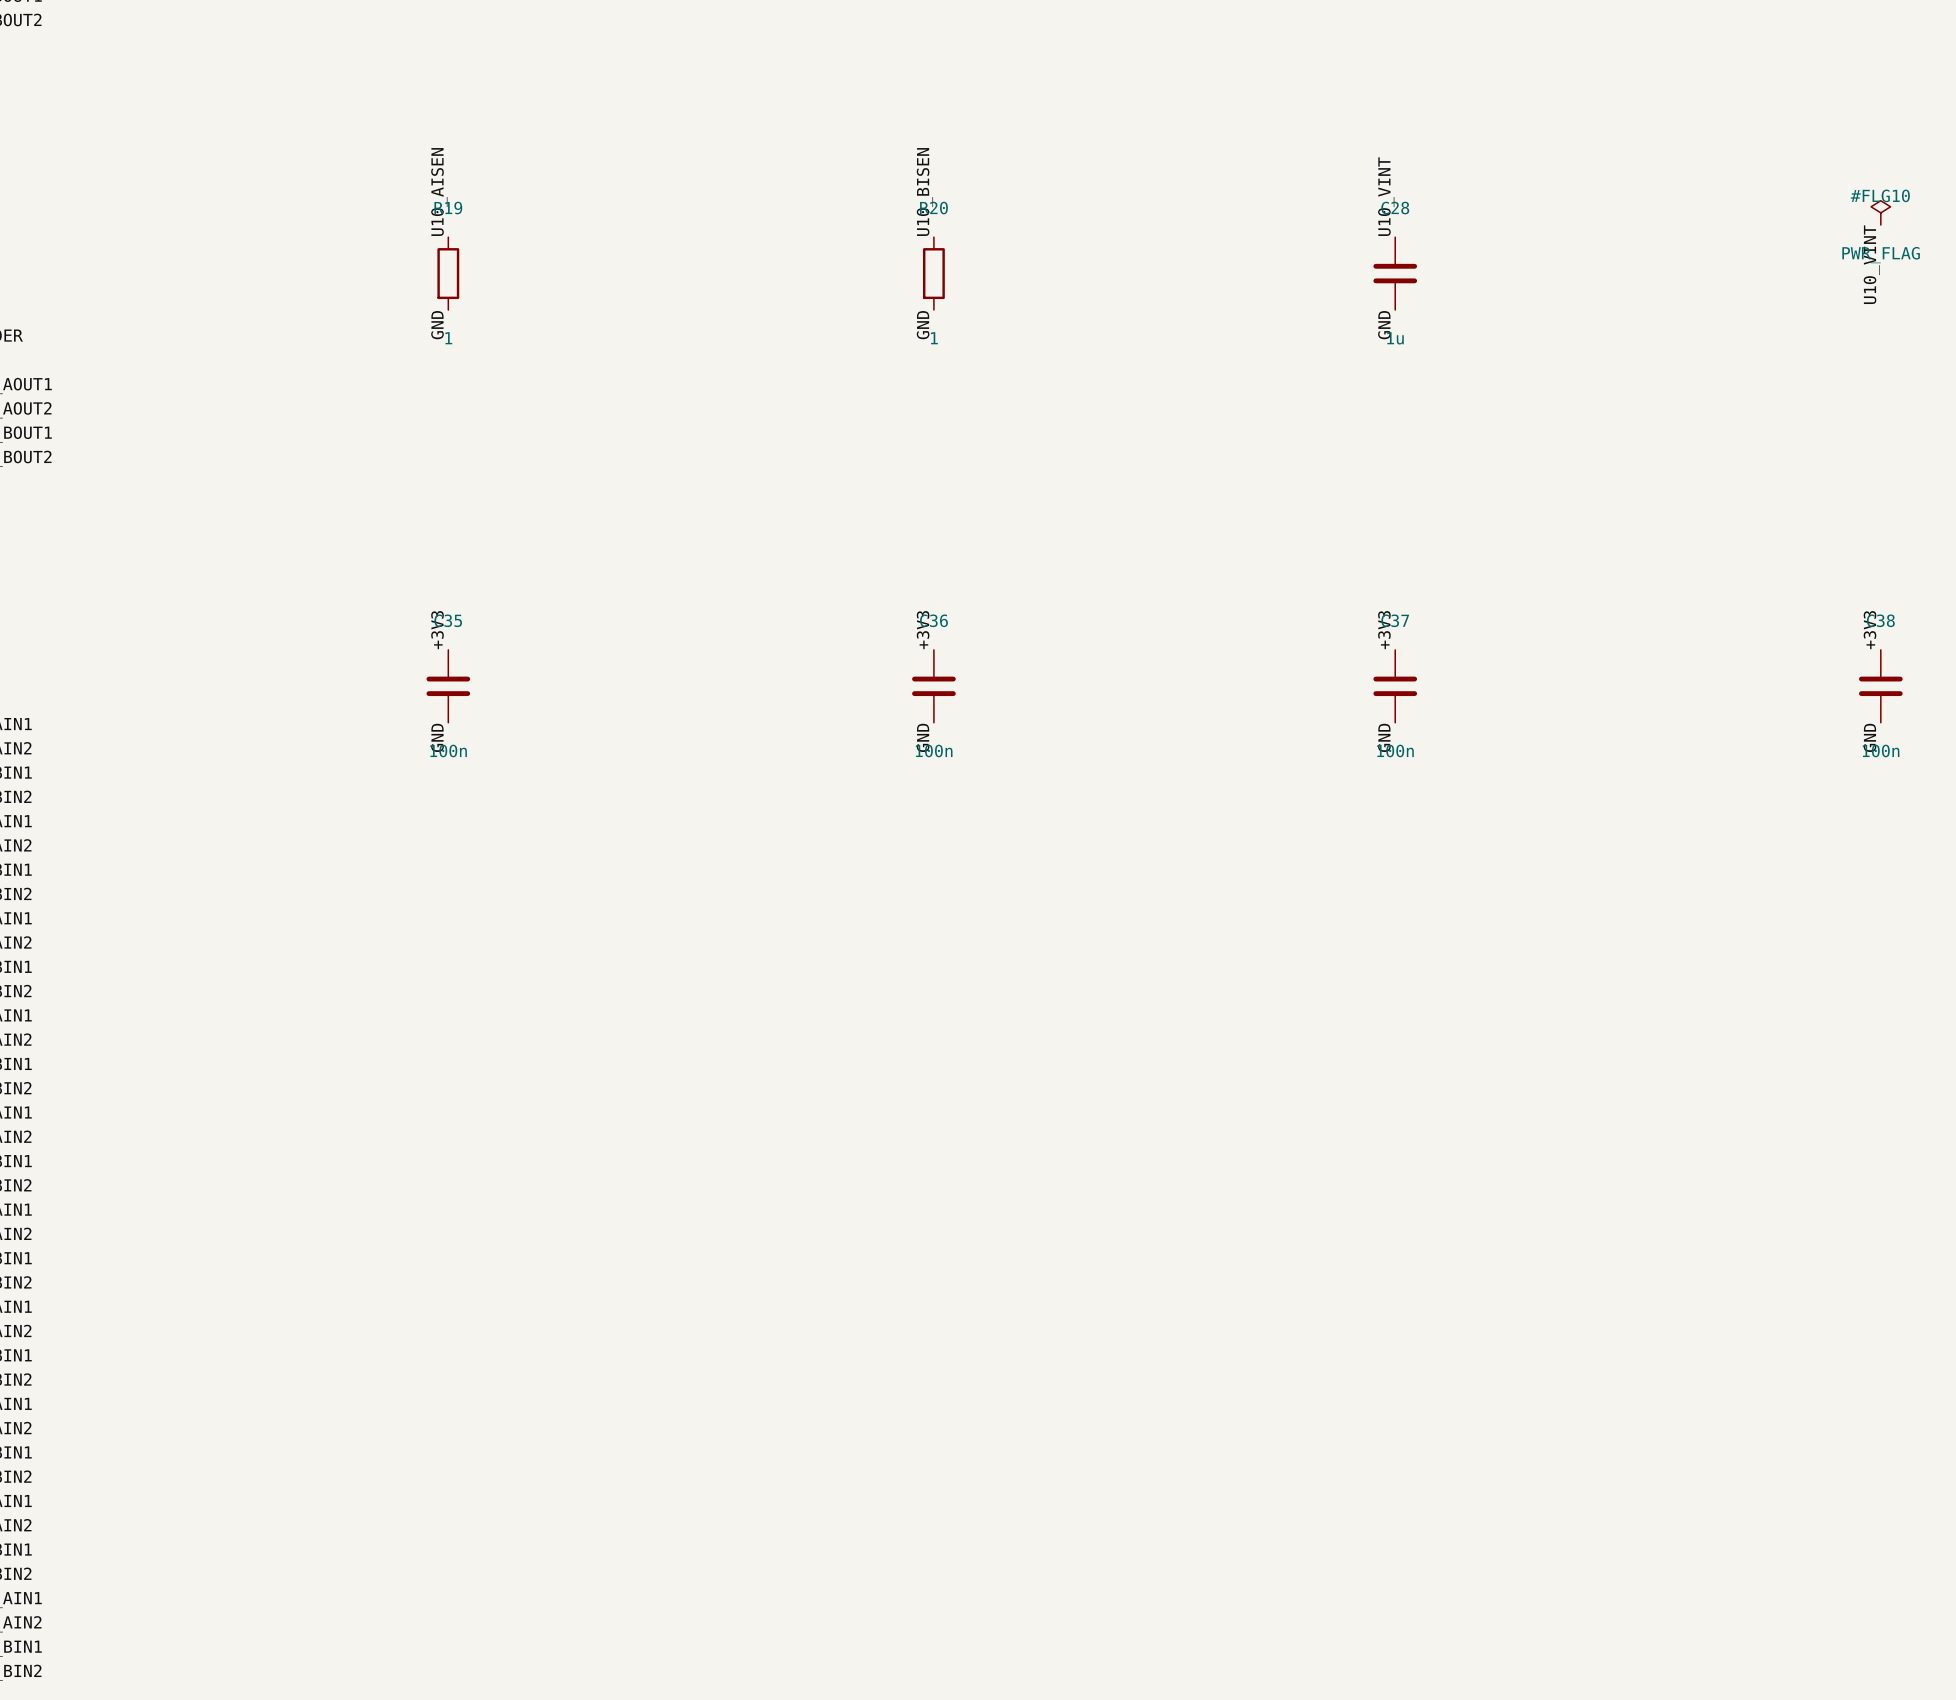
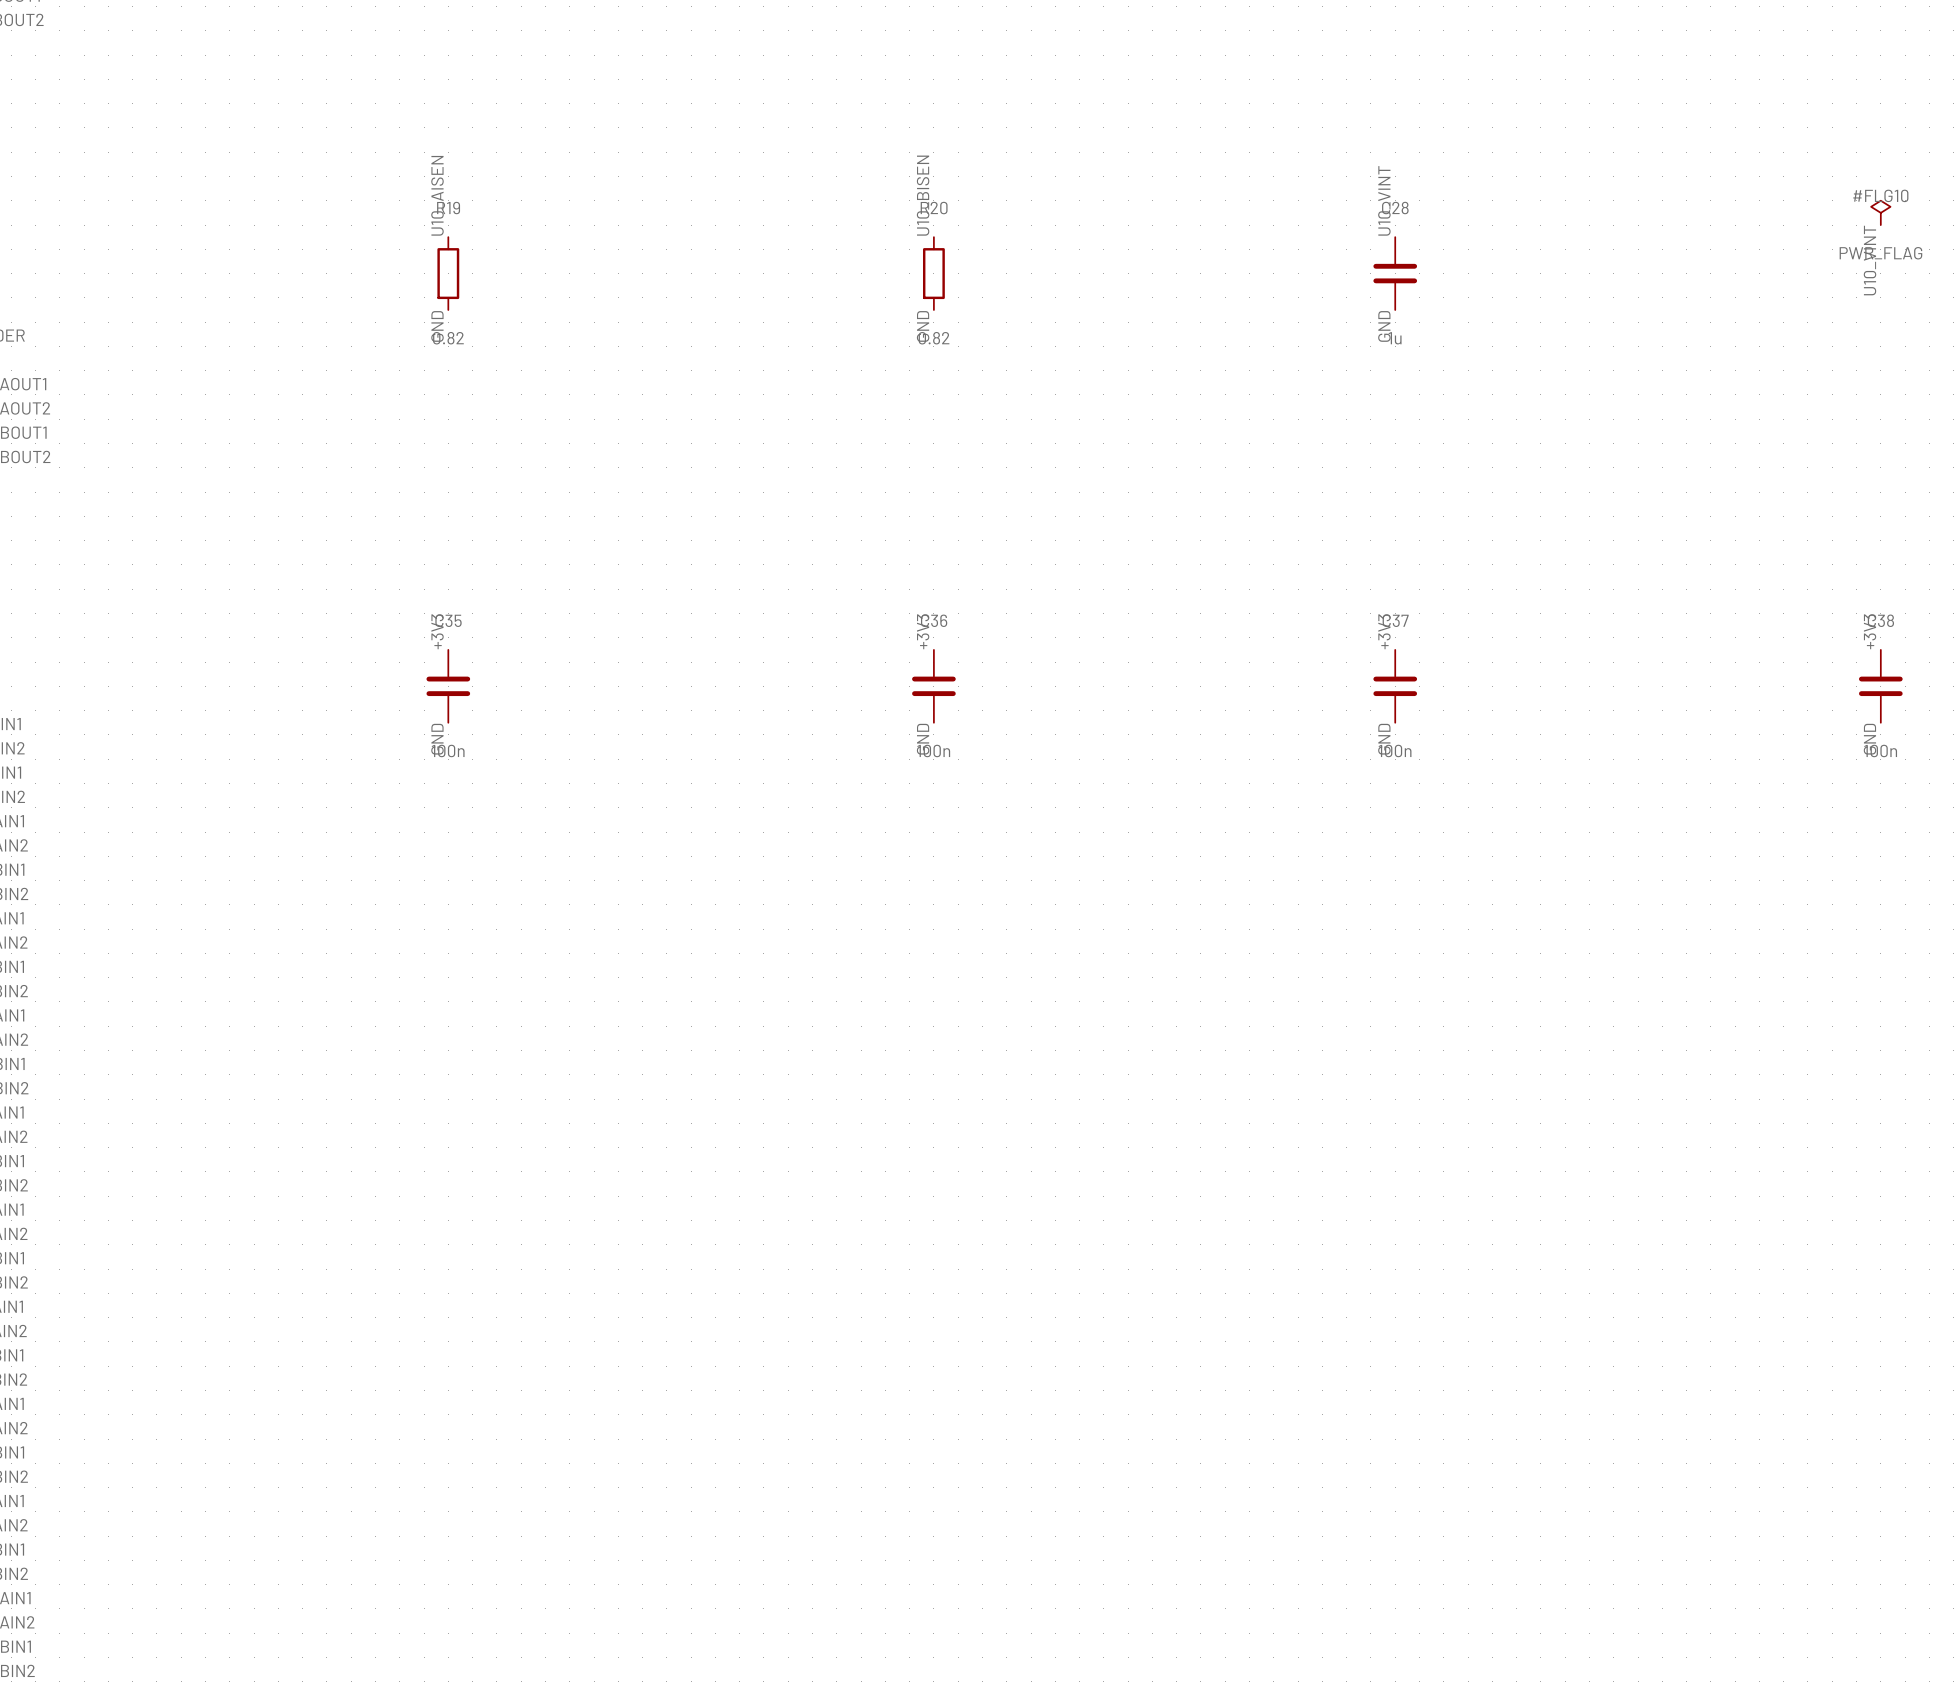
R19 value: 1 (448, 338) -> 0.82 (448, 338)
R20 value: 1 (934, 338) -> 0.82 (934, 338)

